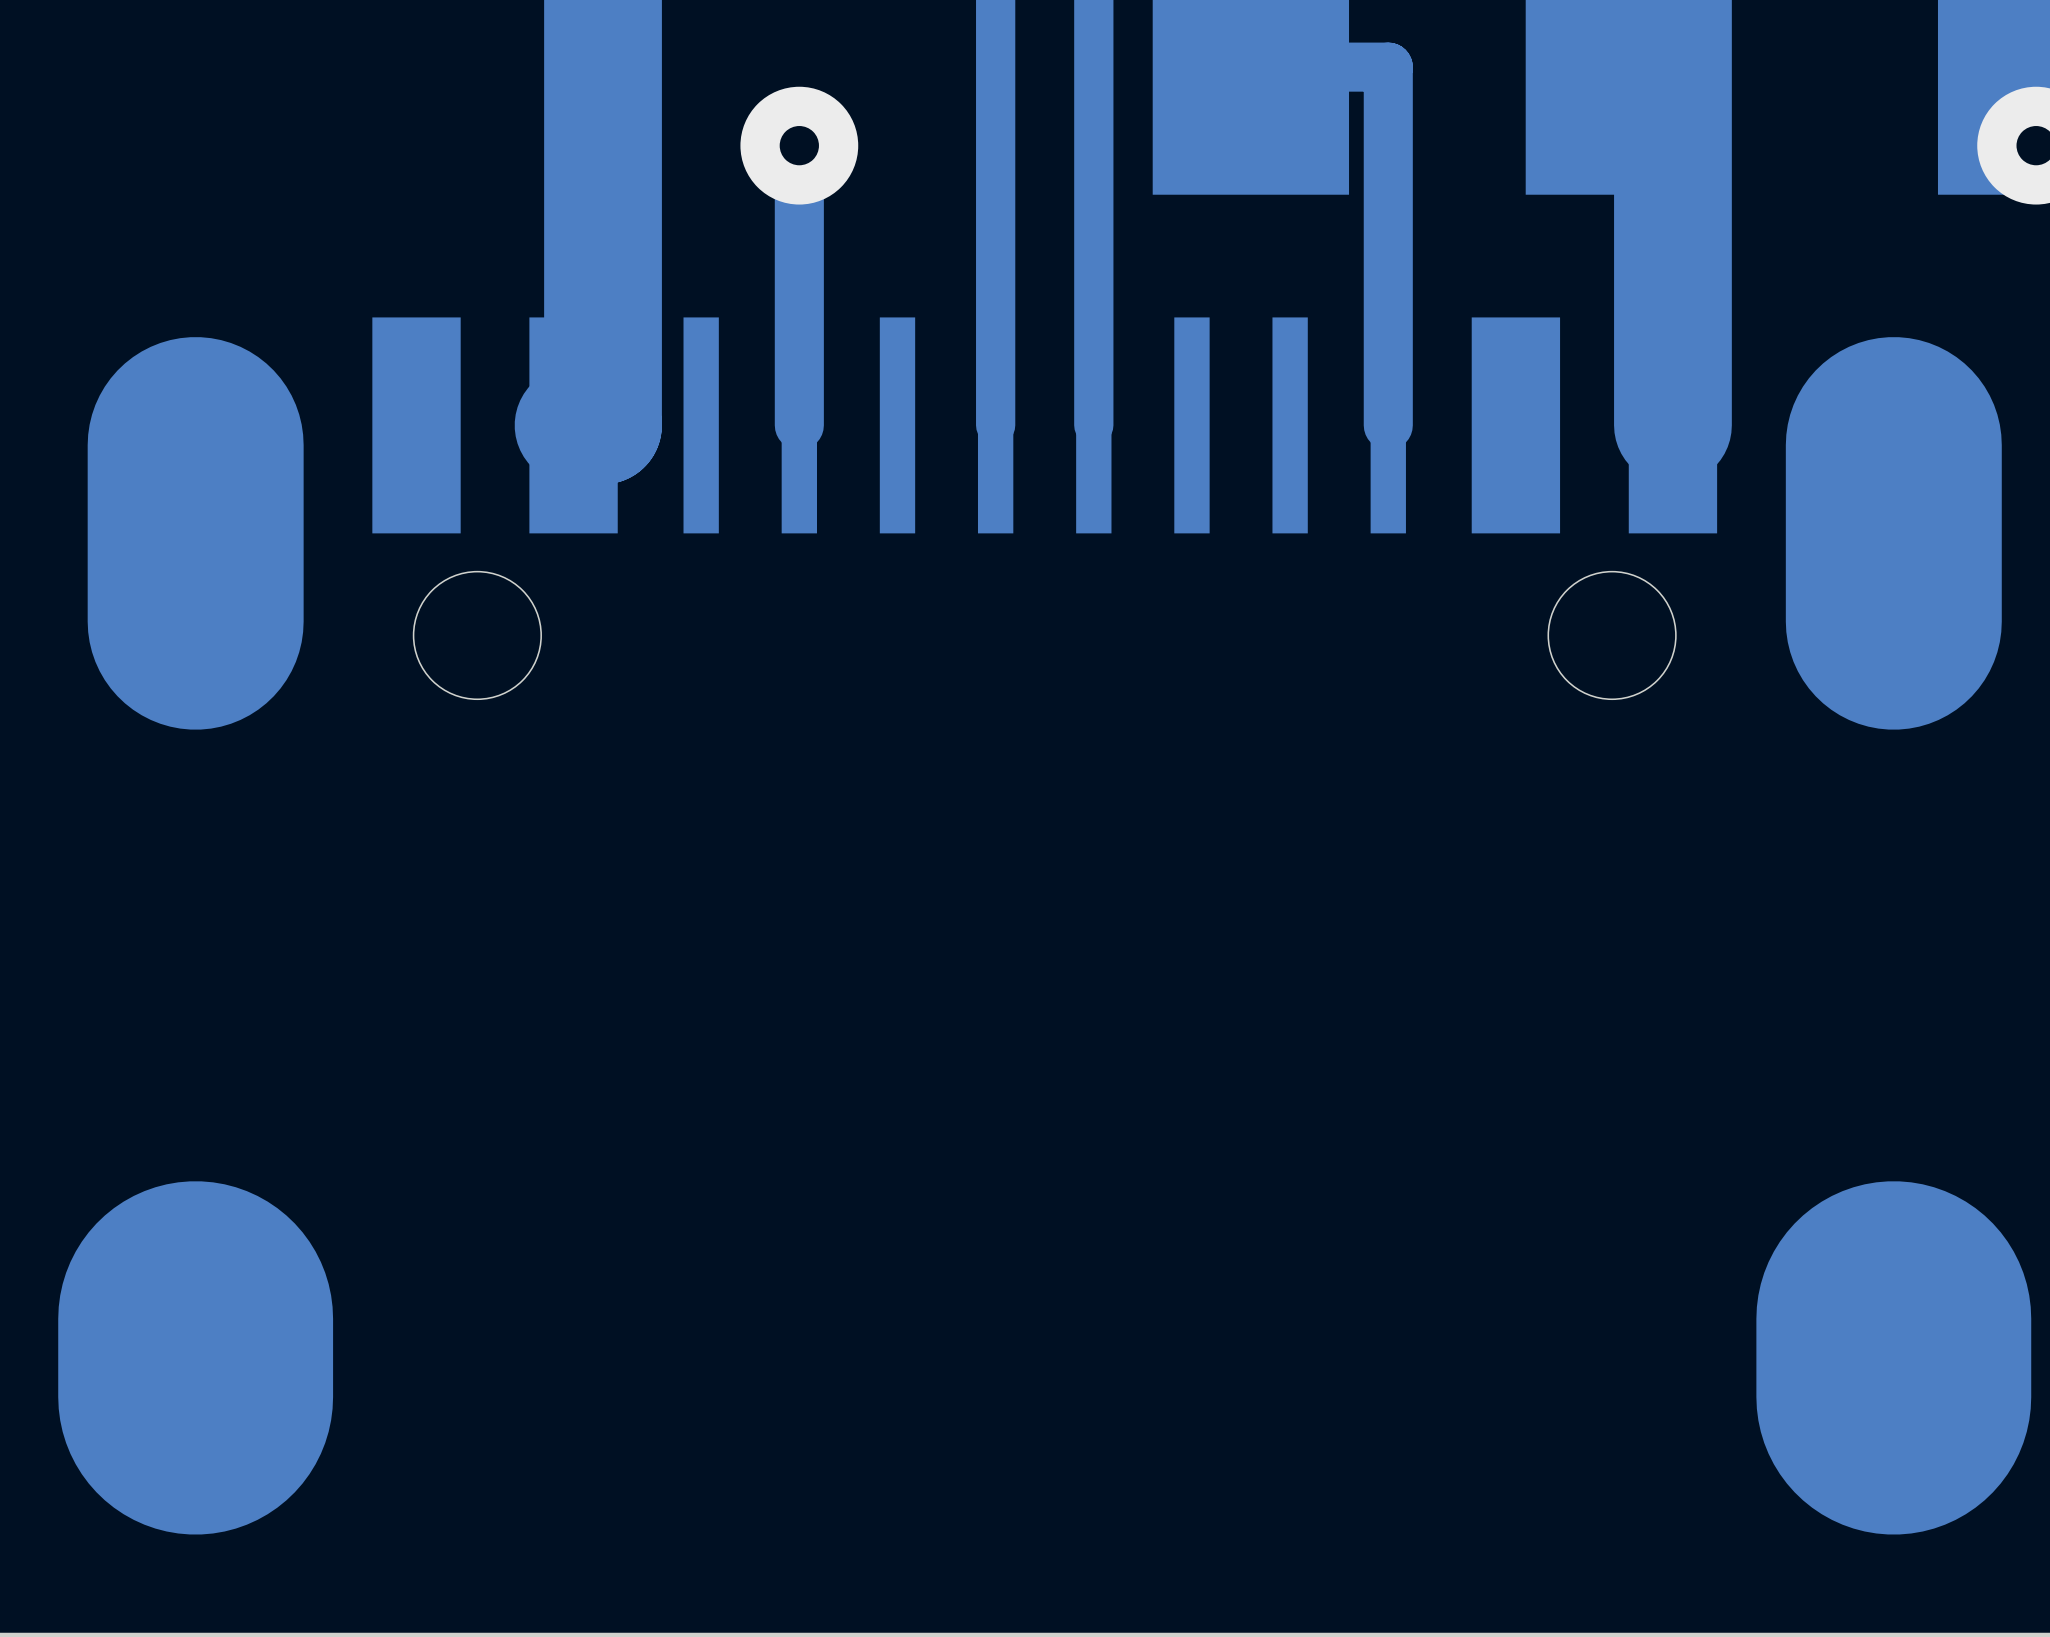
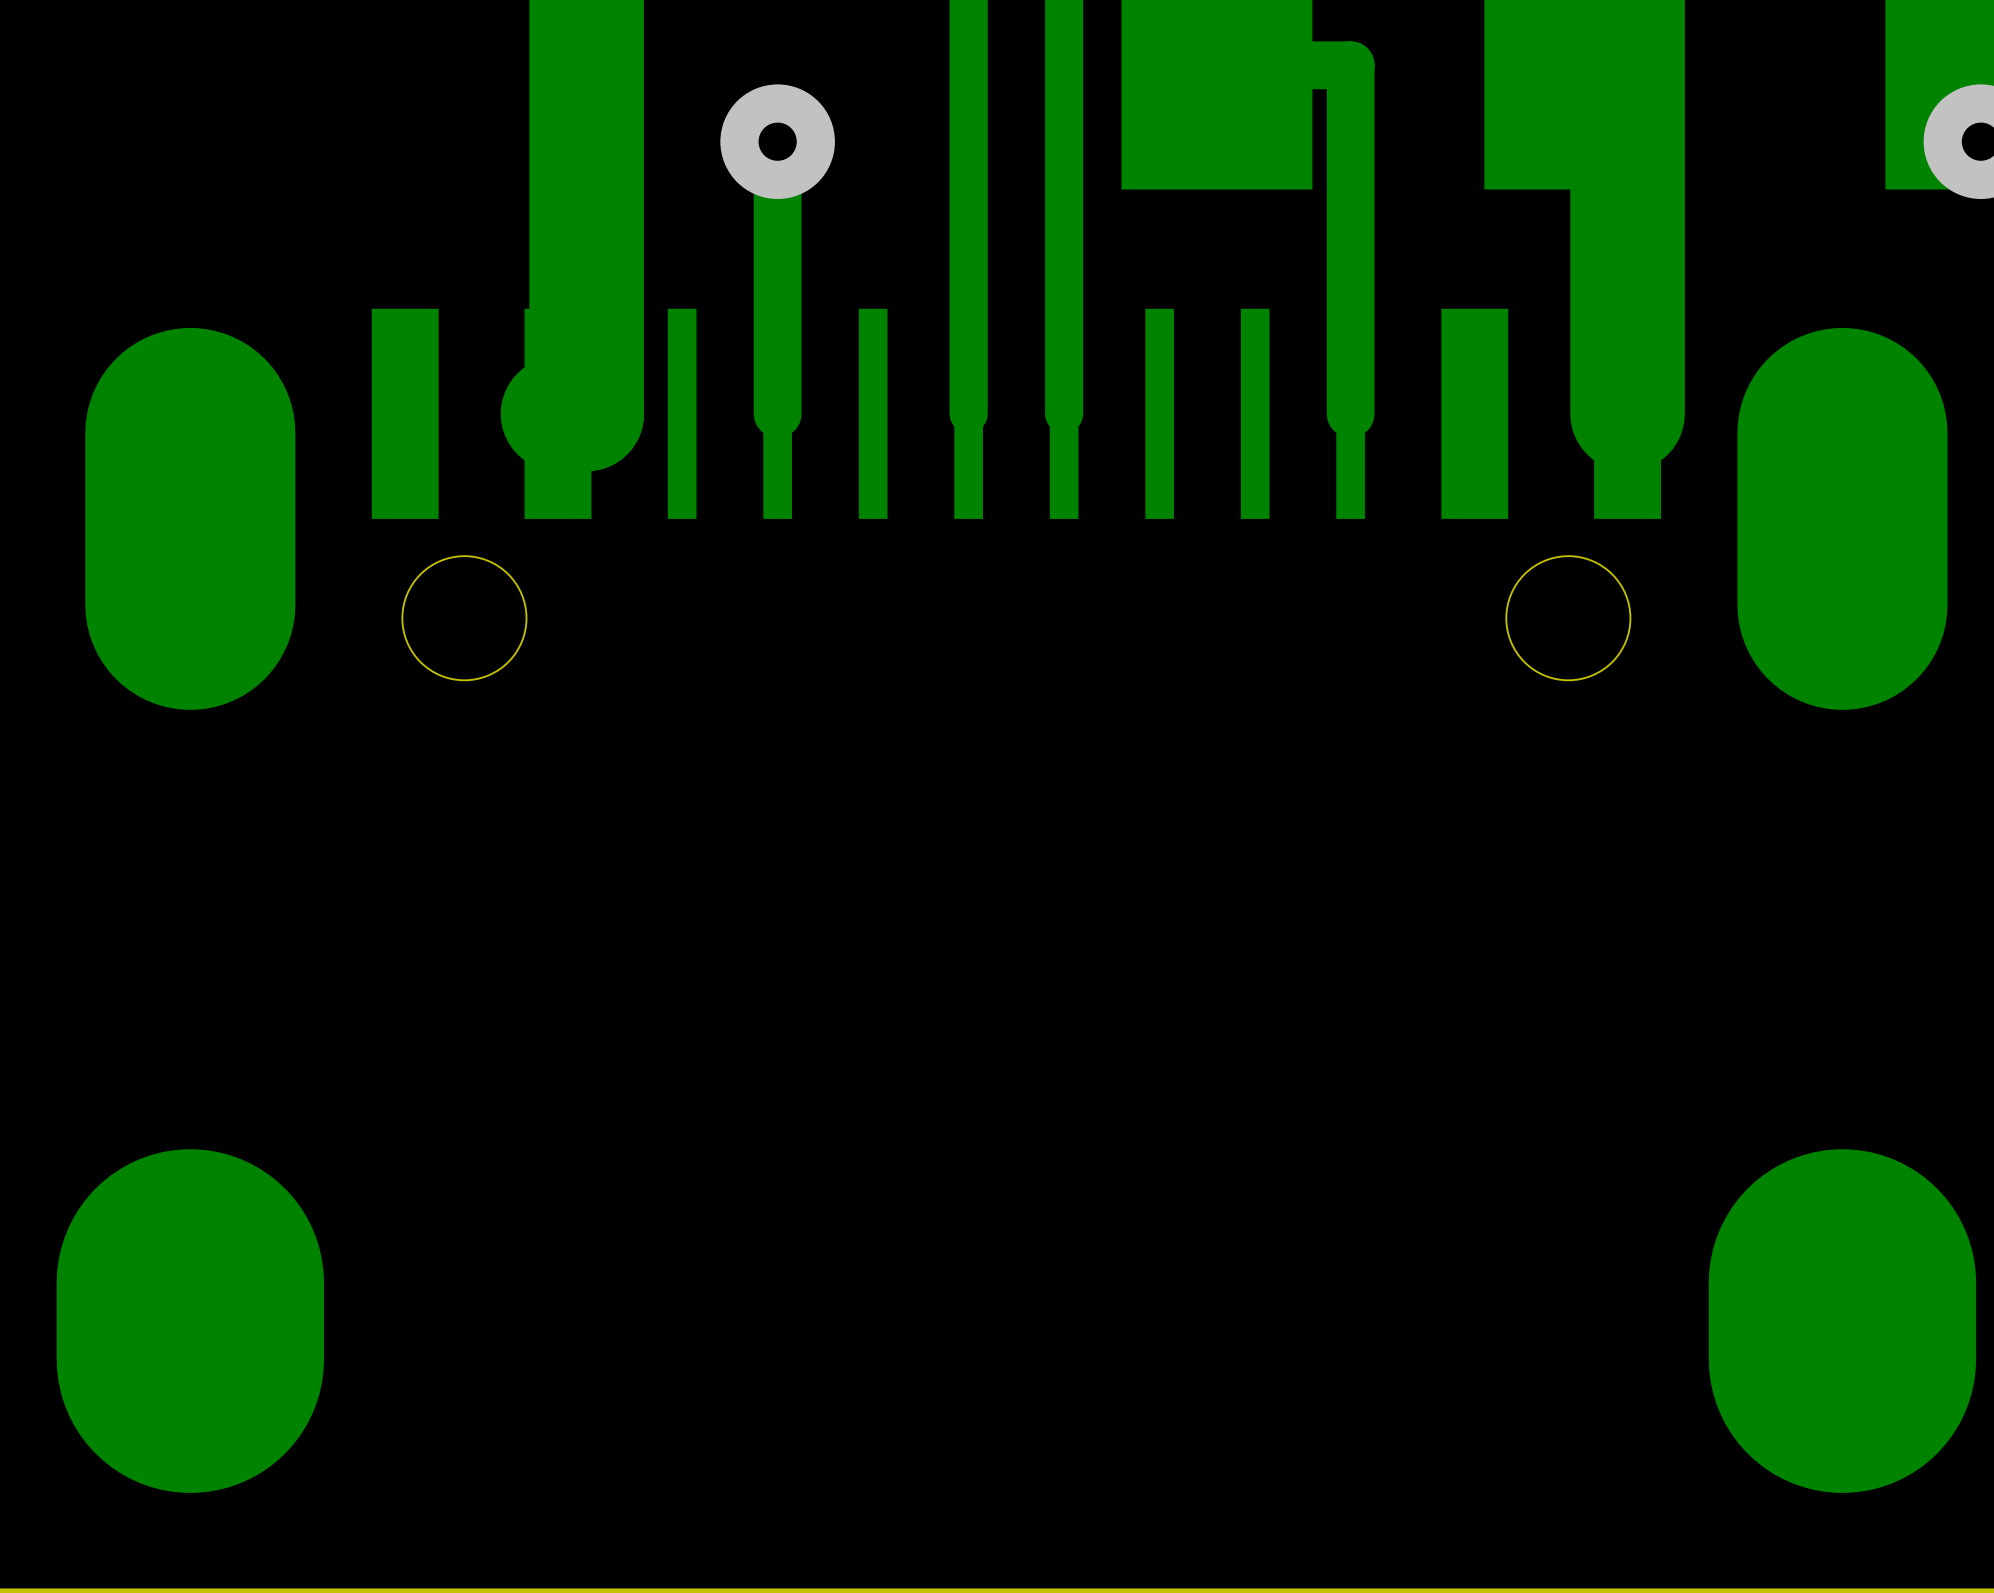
part footprint: [58, 317, 2032, 1535] -> [56, 308, 1977, 1493]

